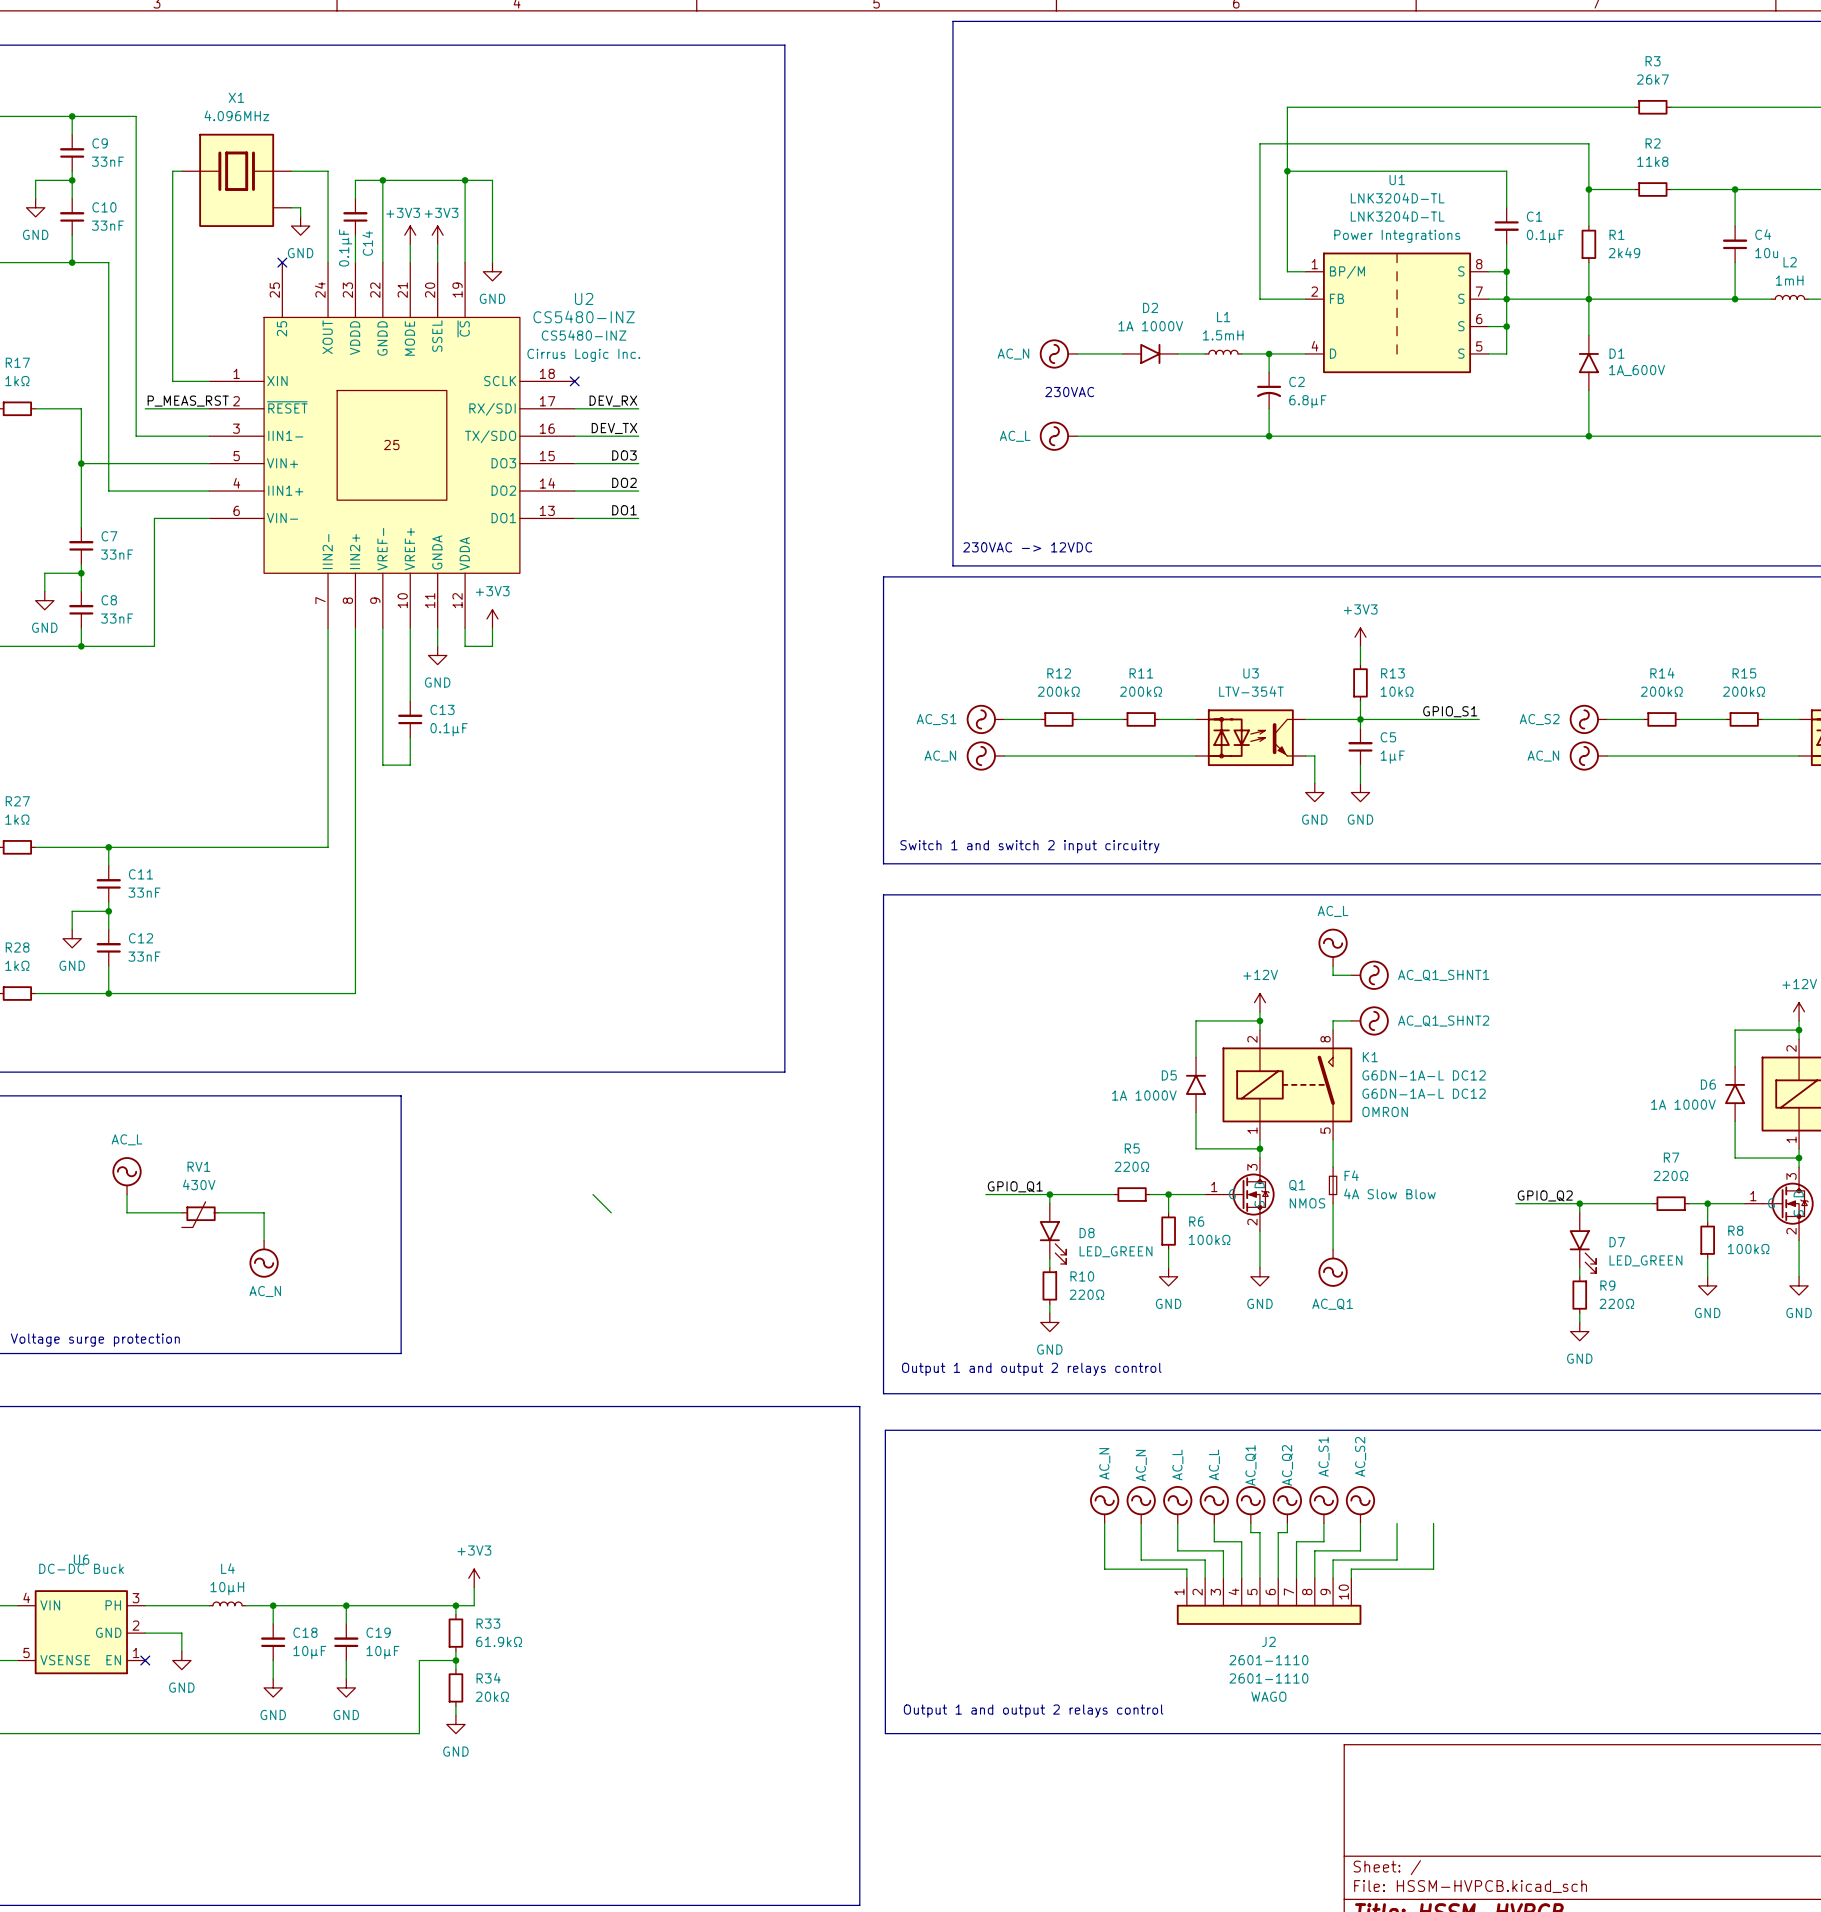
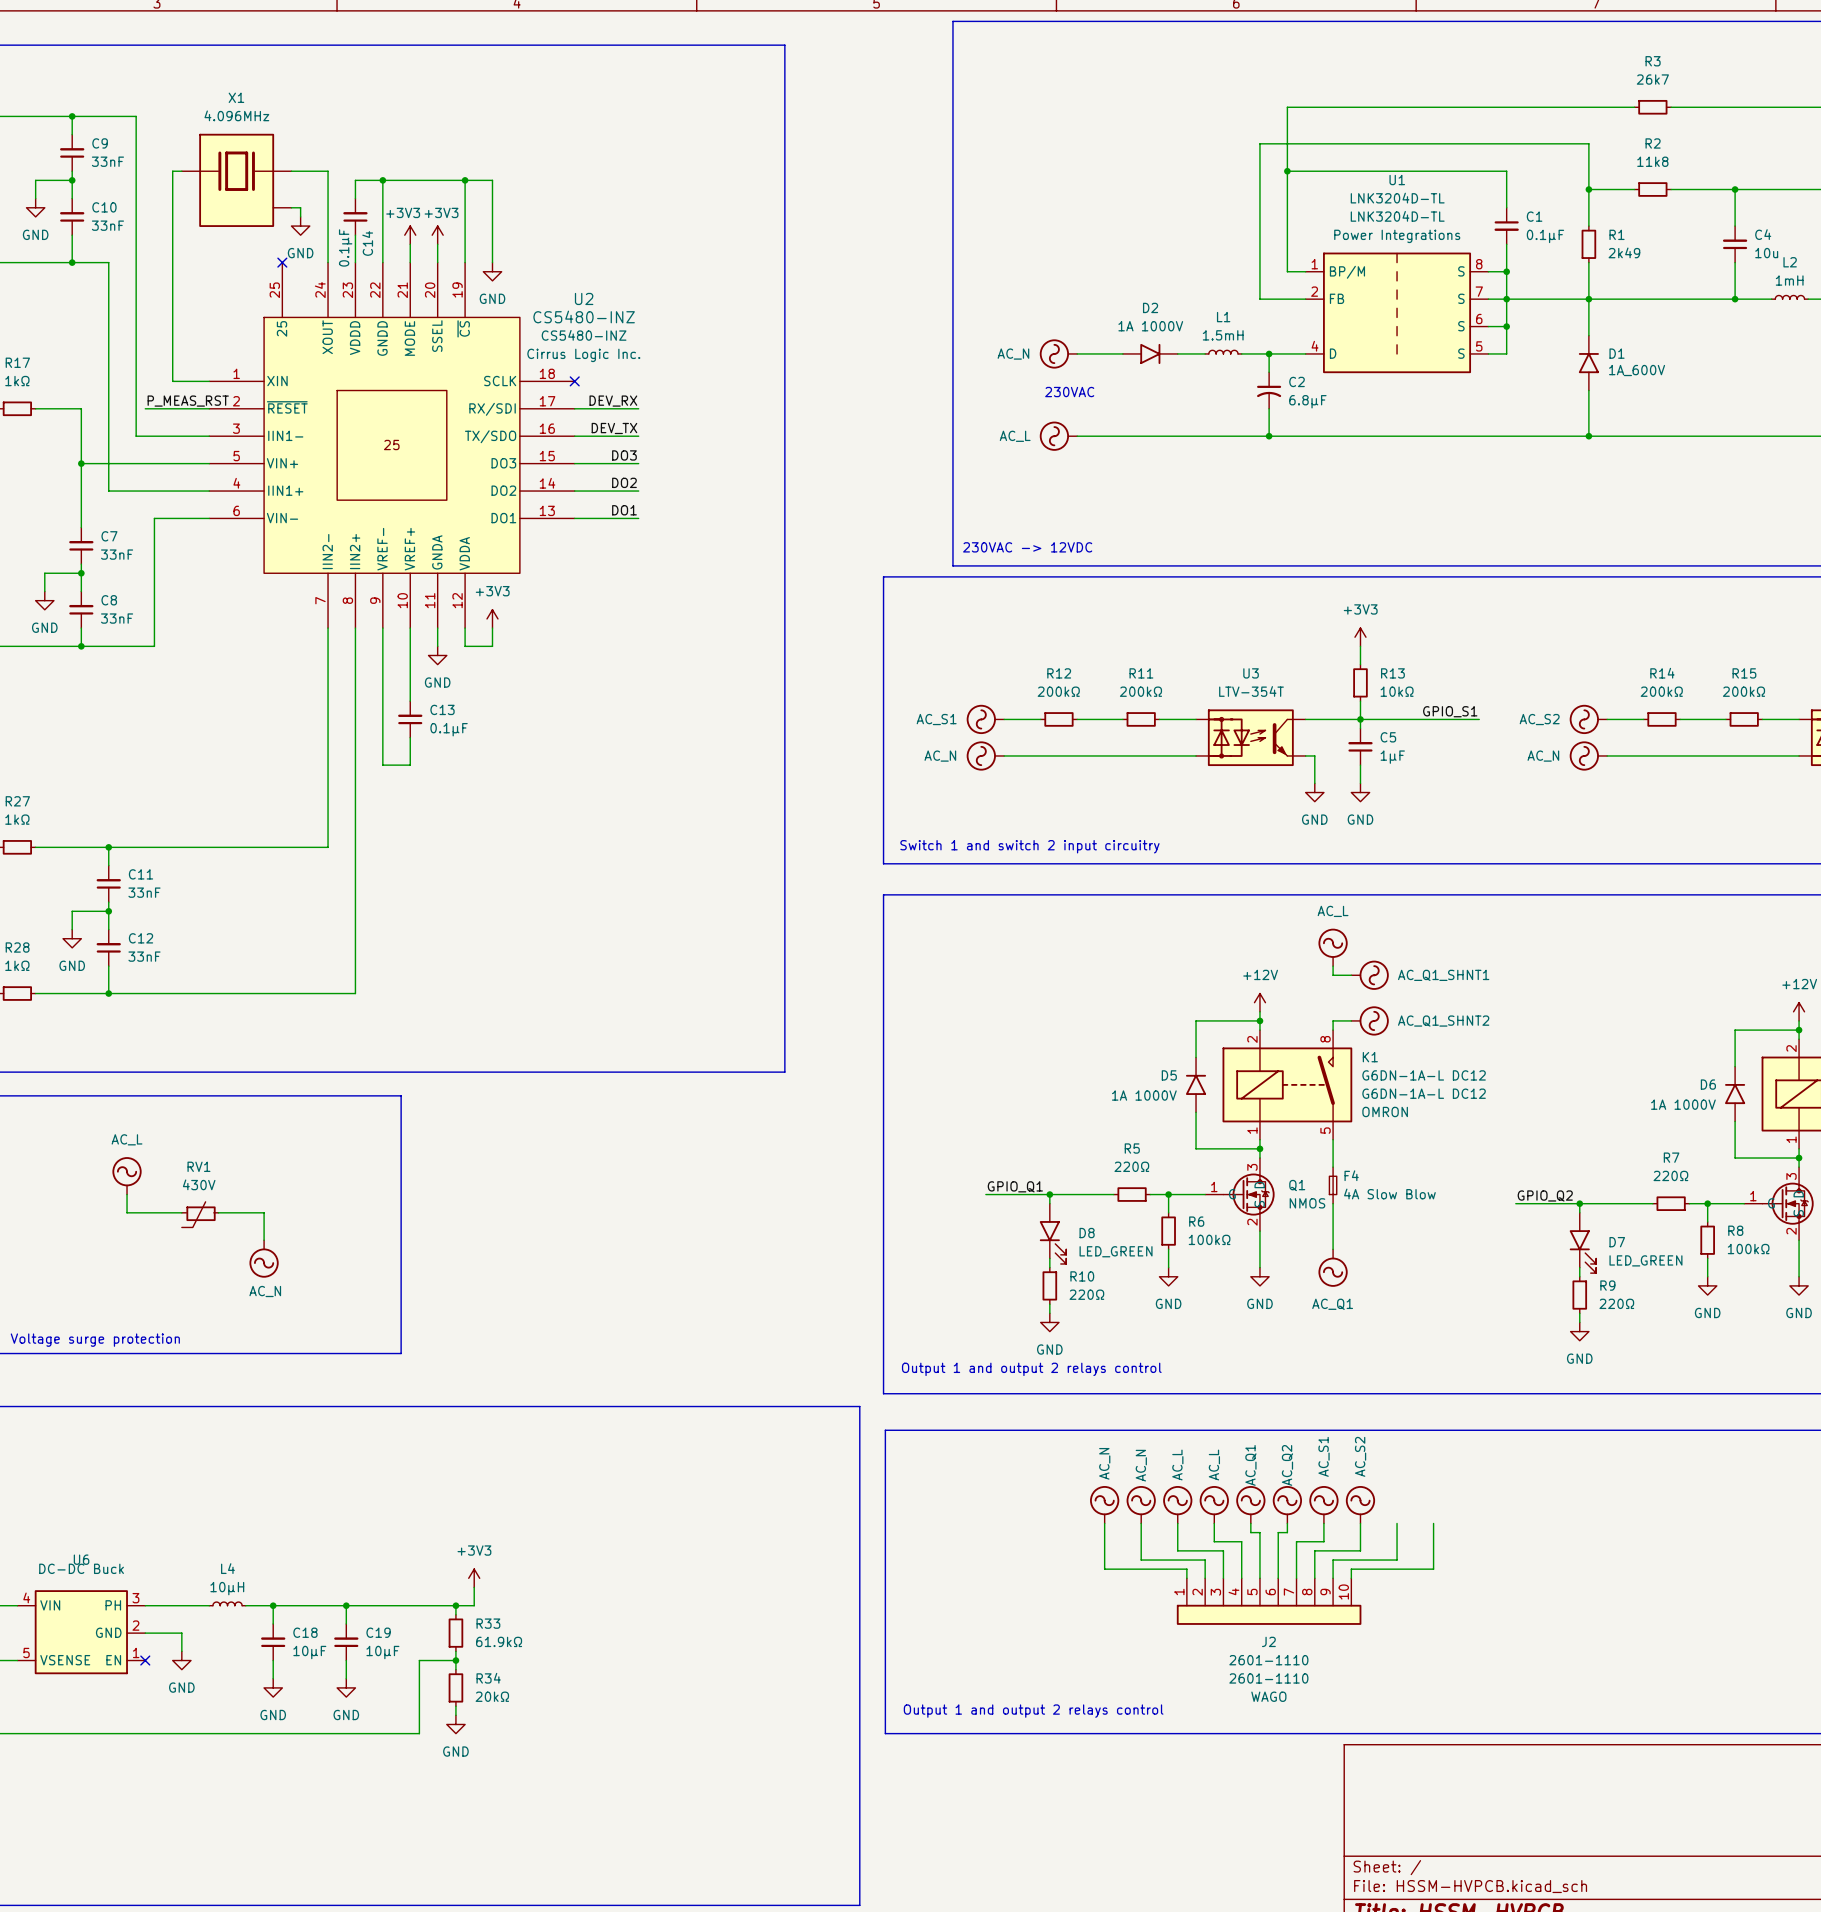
wire: (592, 1194) (611, 1212) -> none

